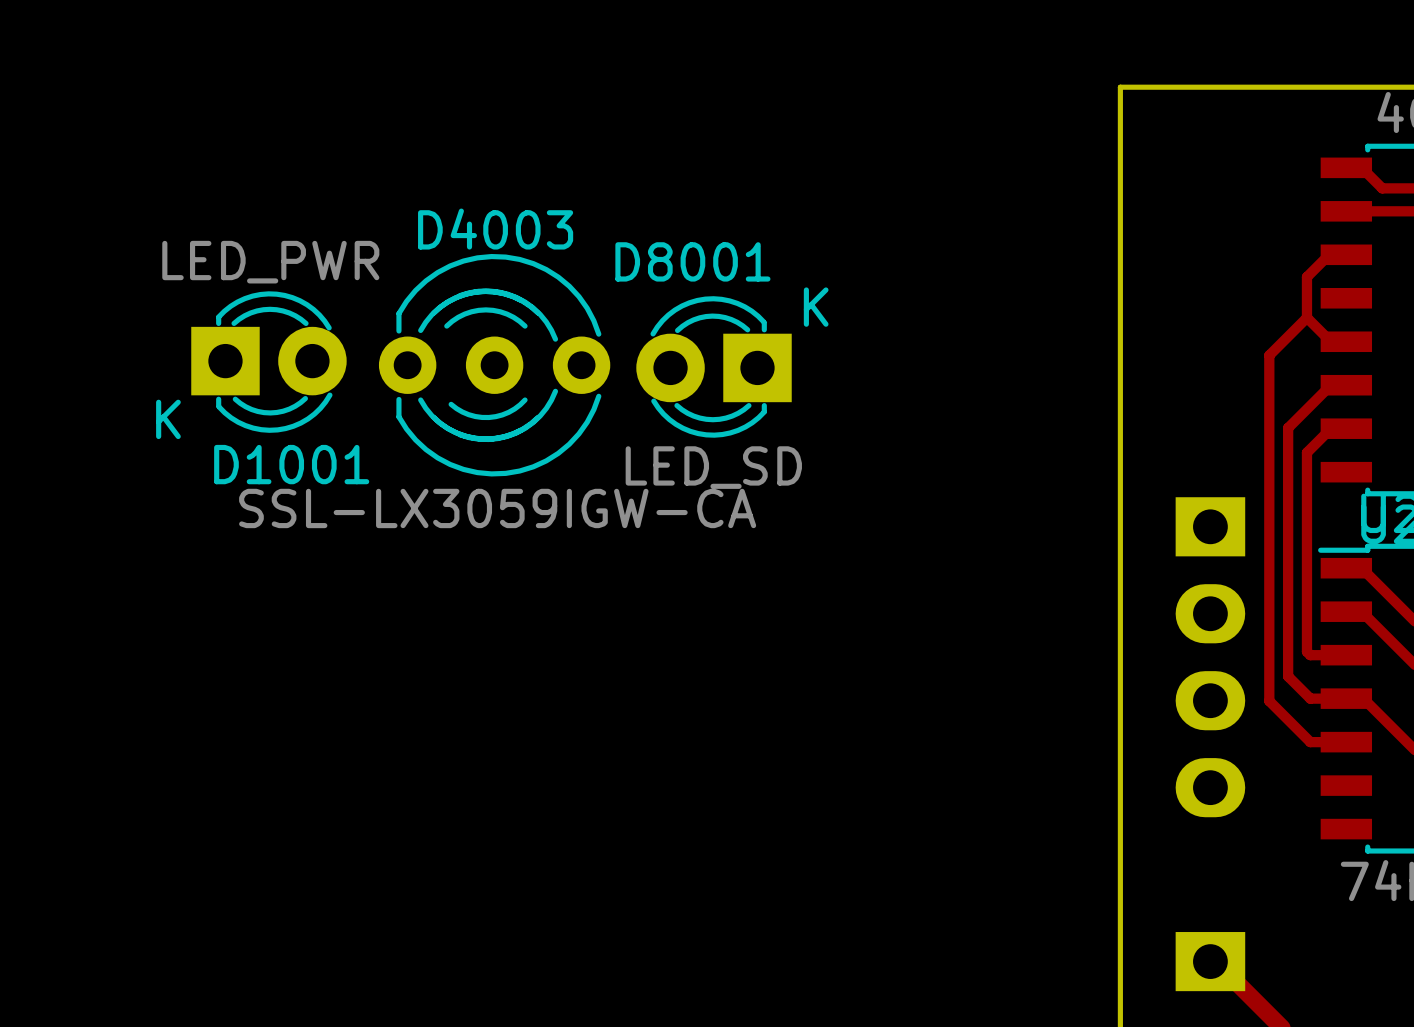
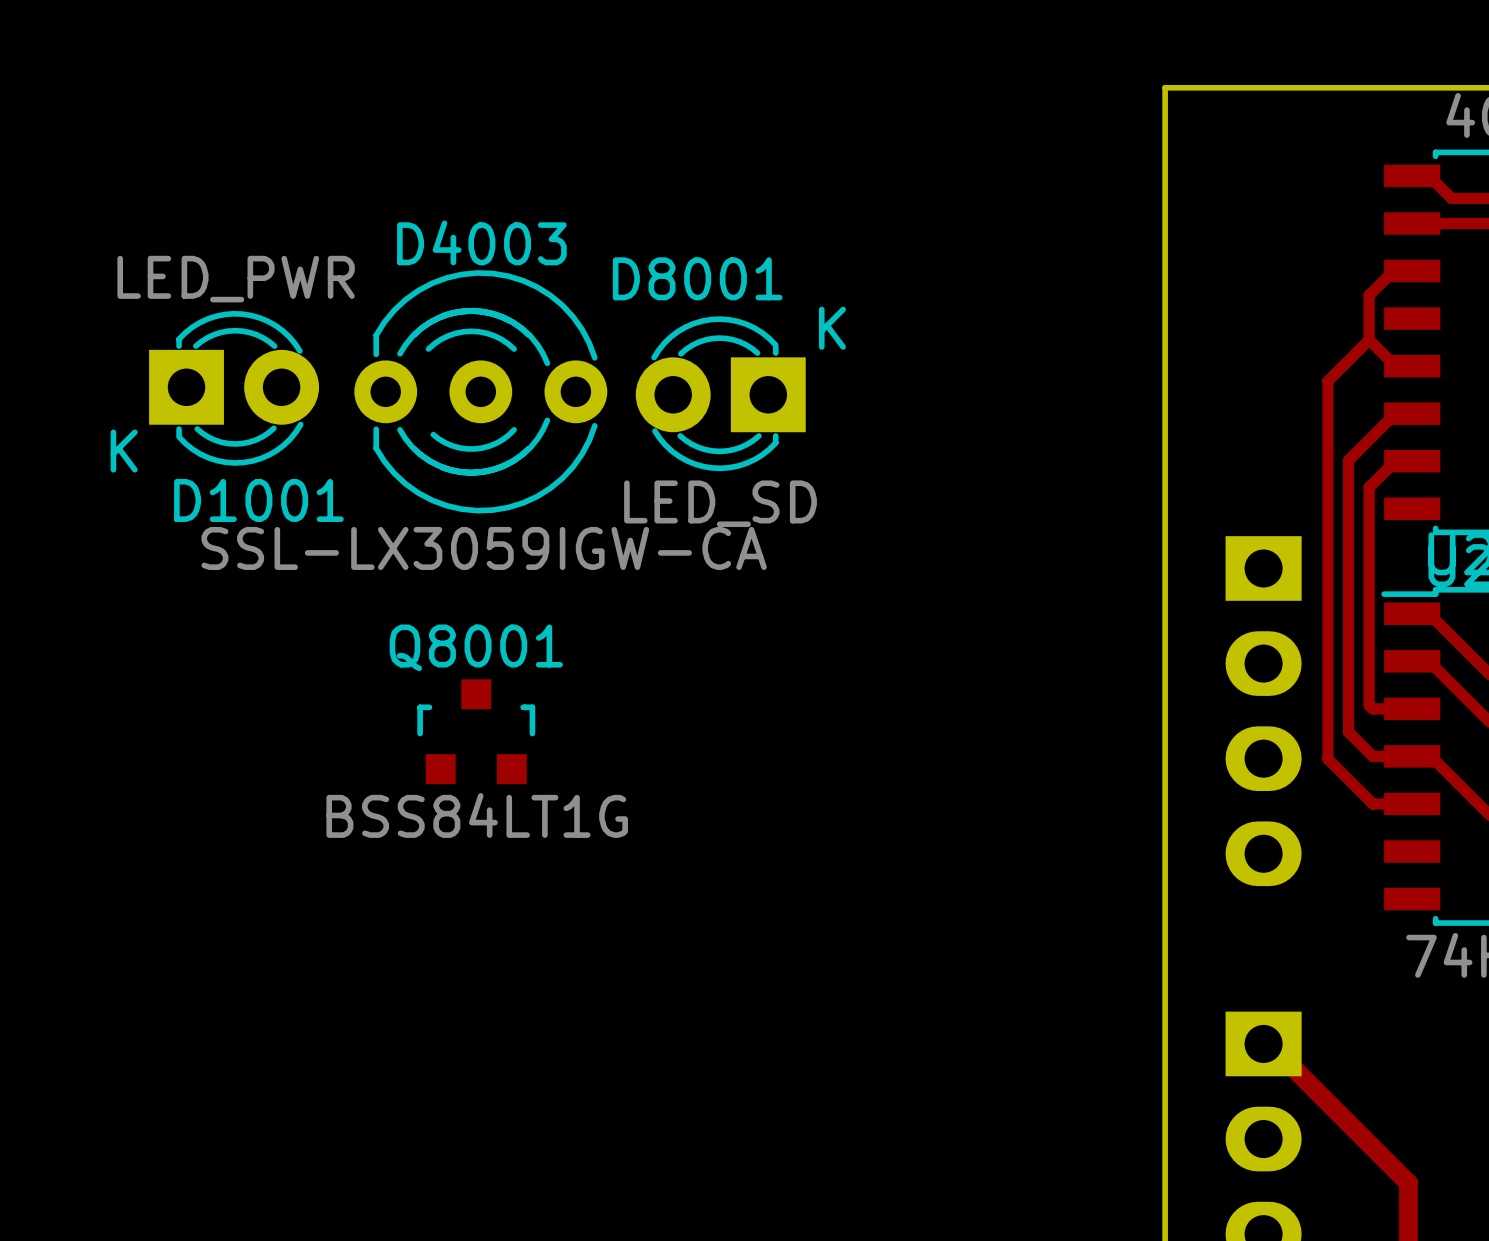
Q8001: none -> BSS84LT1G (476, 731)

